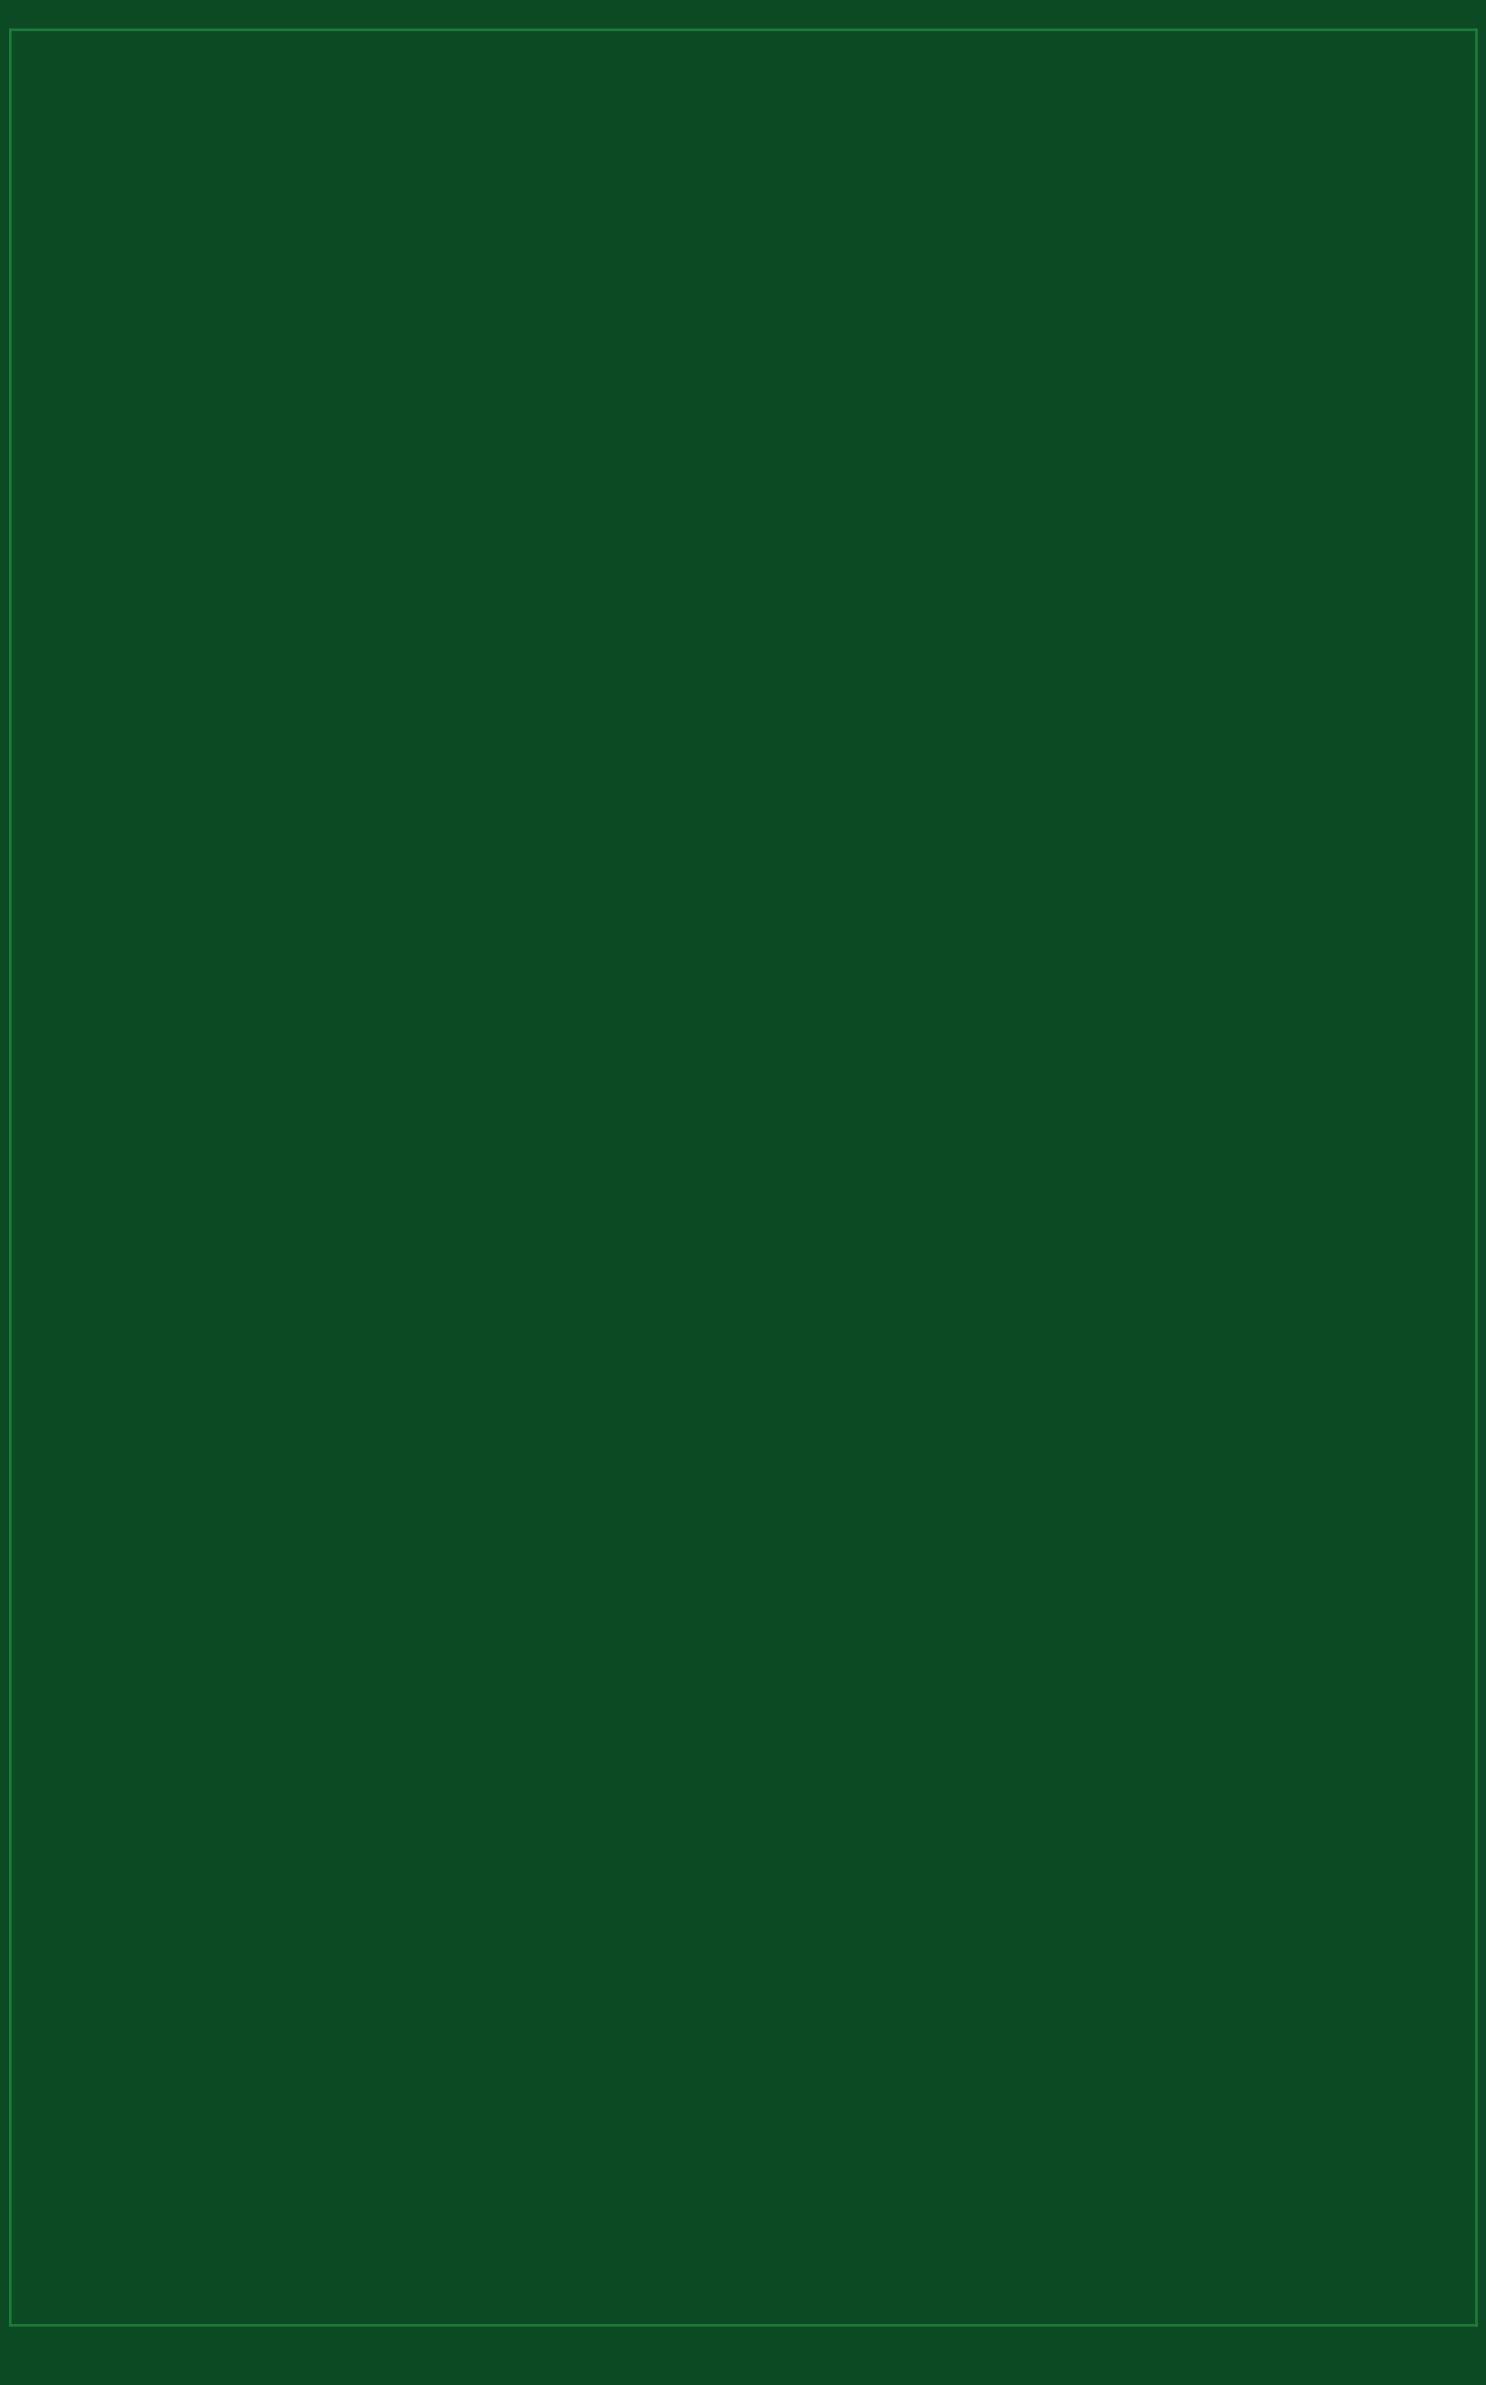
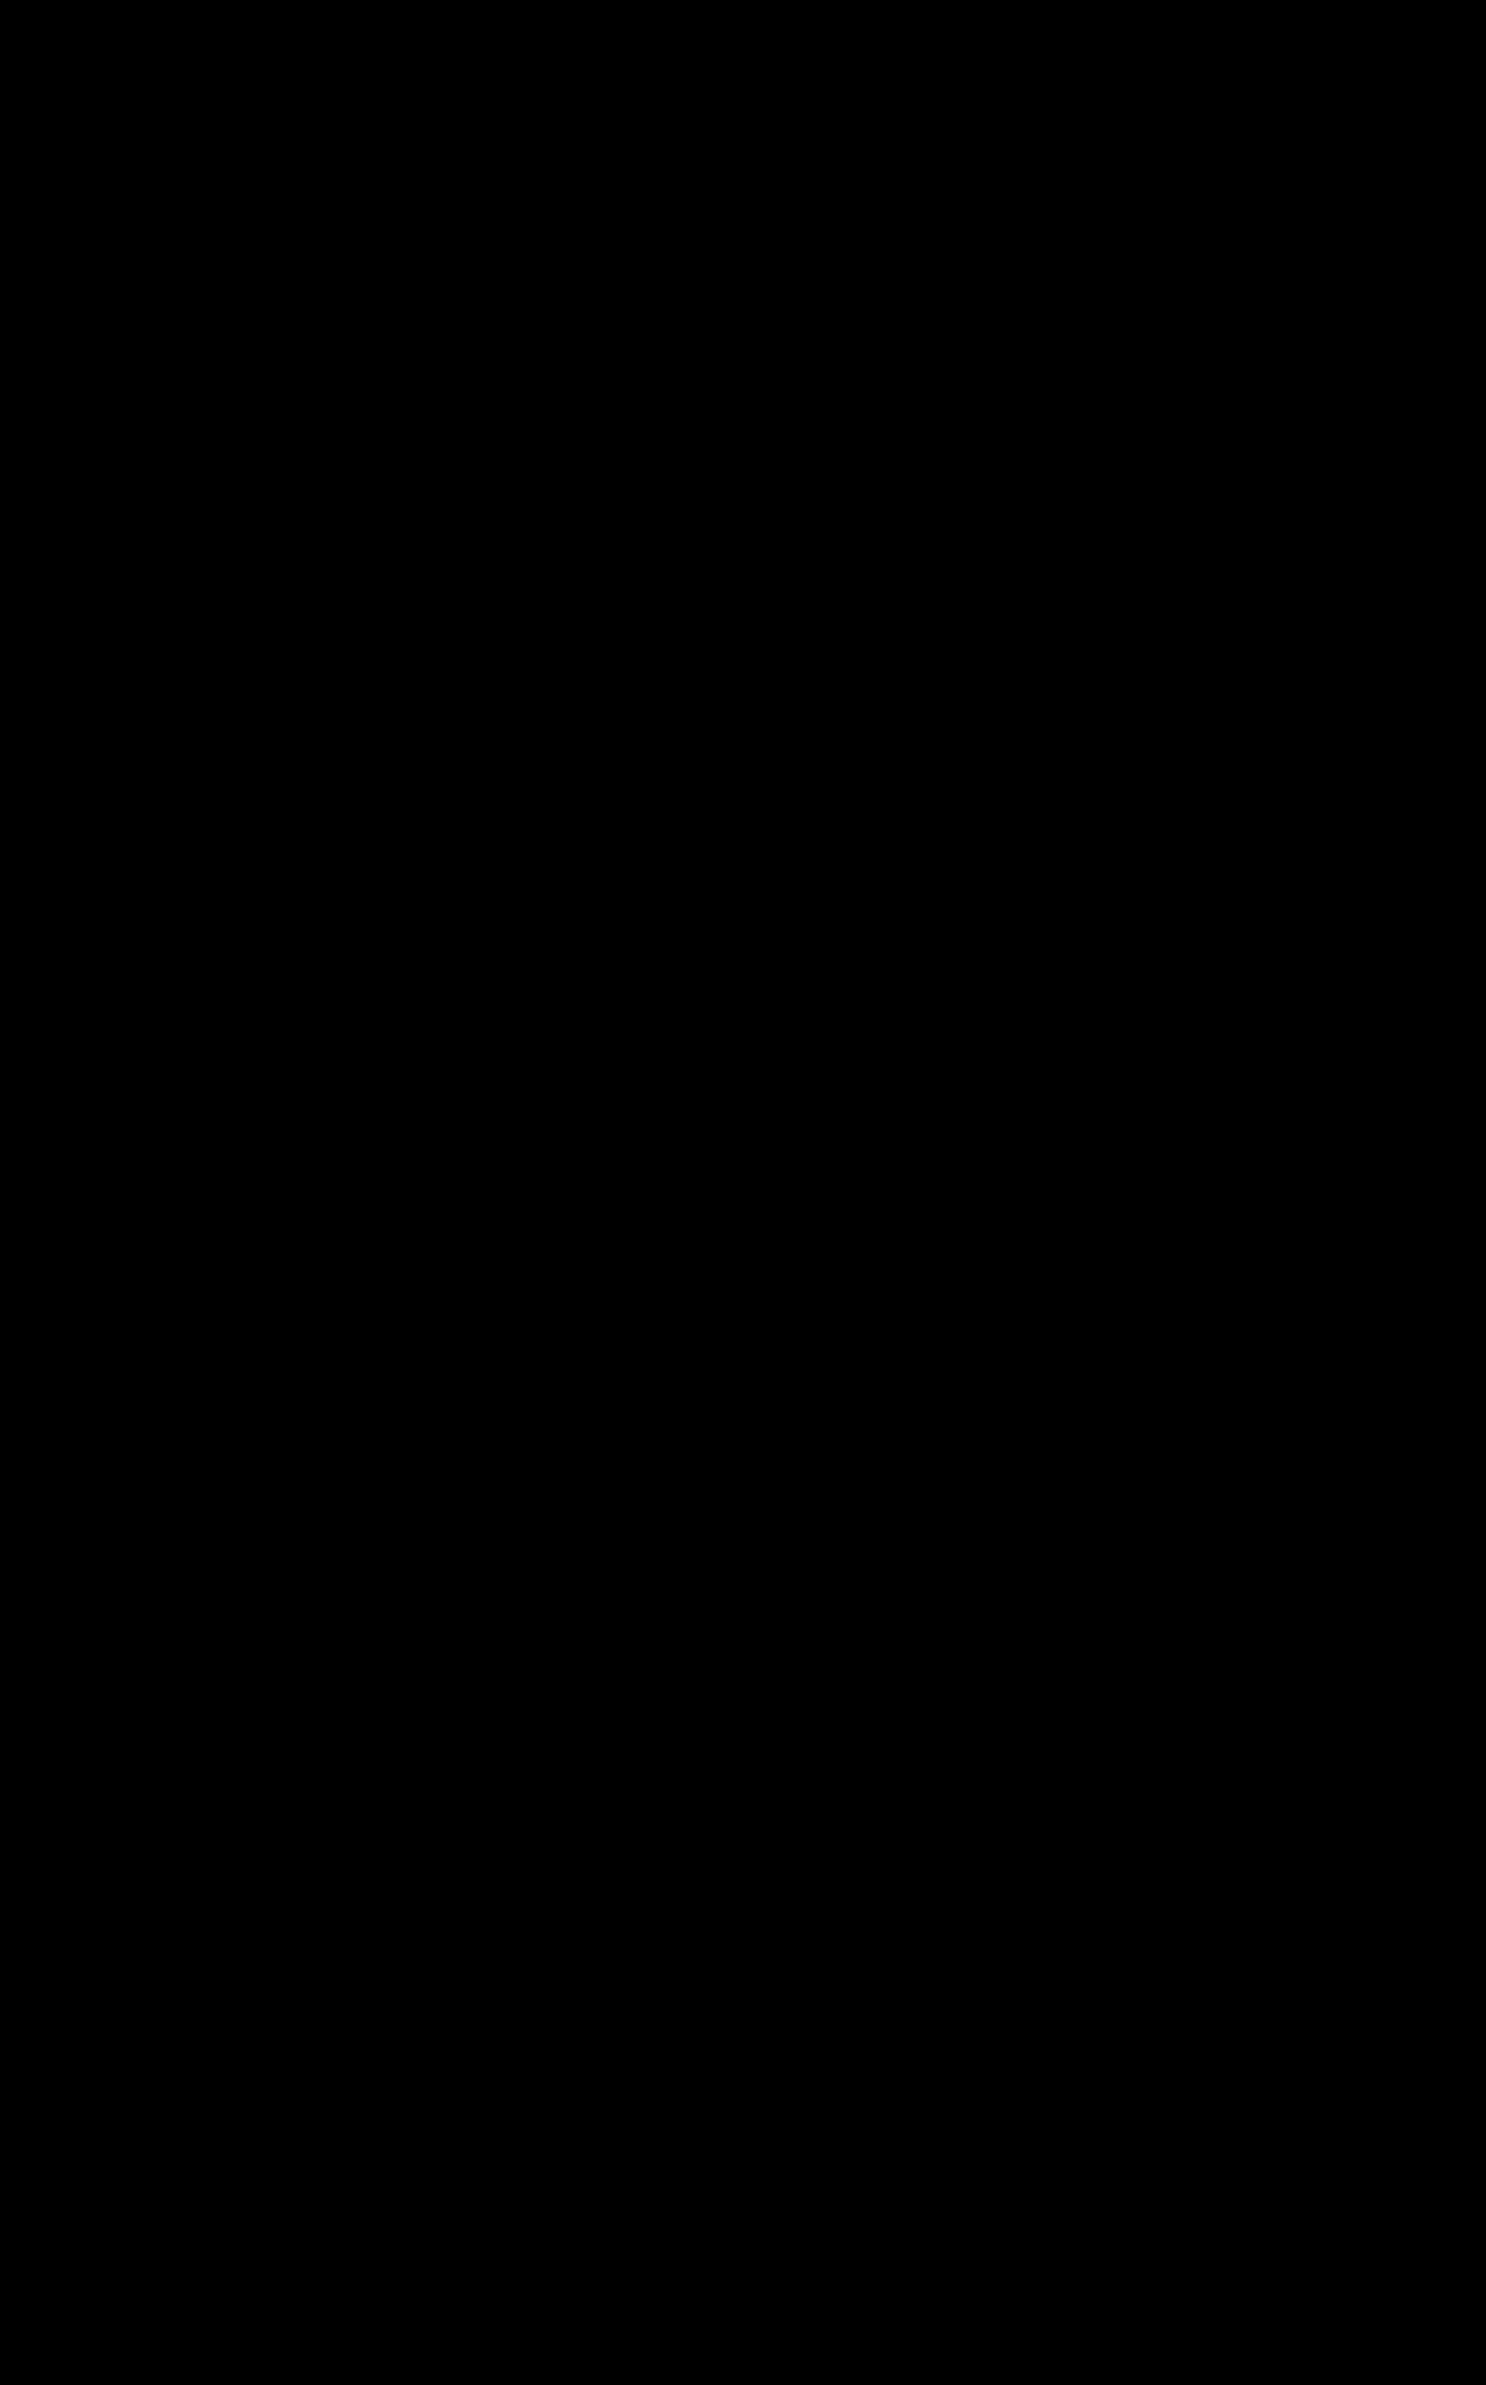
track: (10, 29) (1476, 29) (1476, 2325) (10, 2325) (10, 29) -> none

